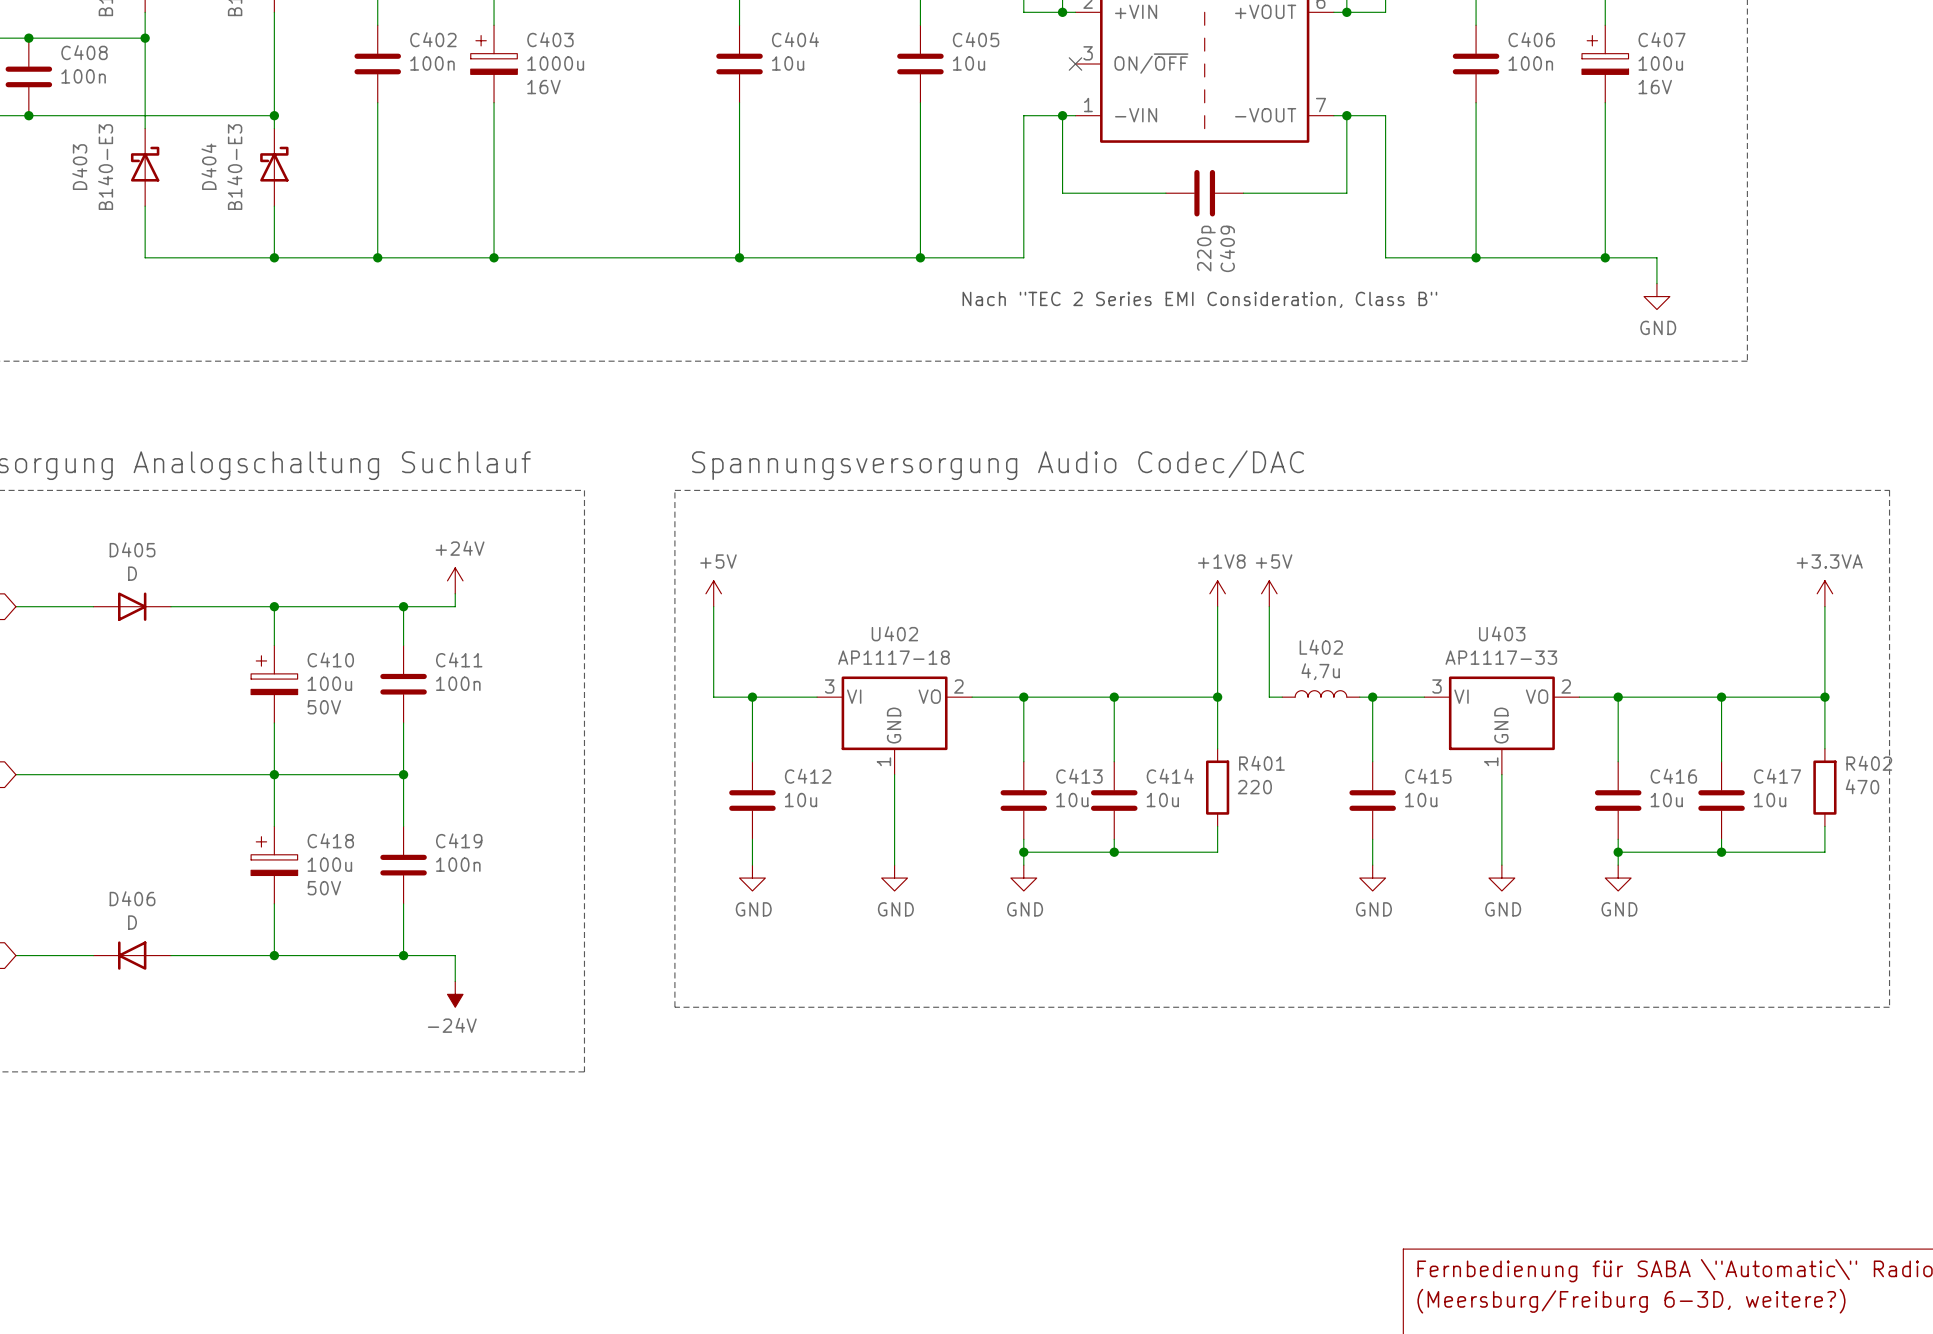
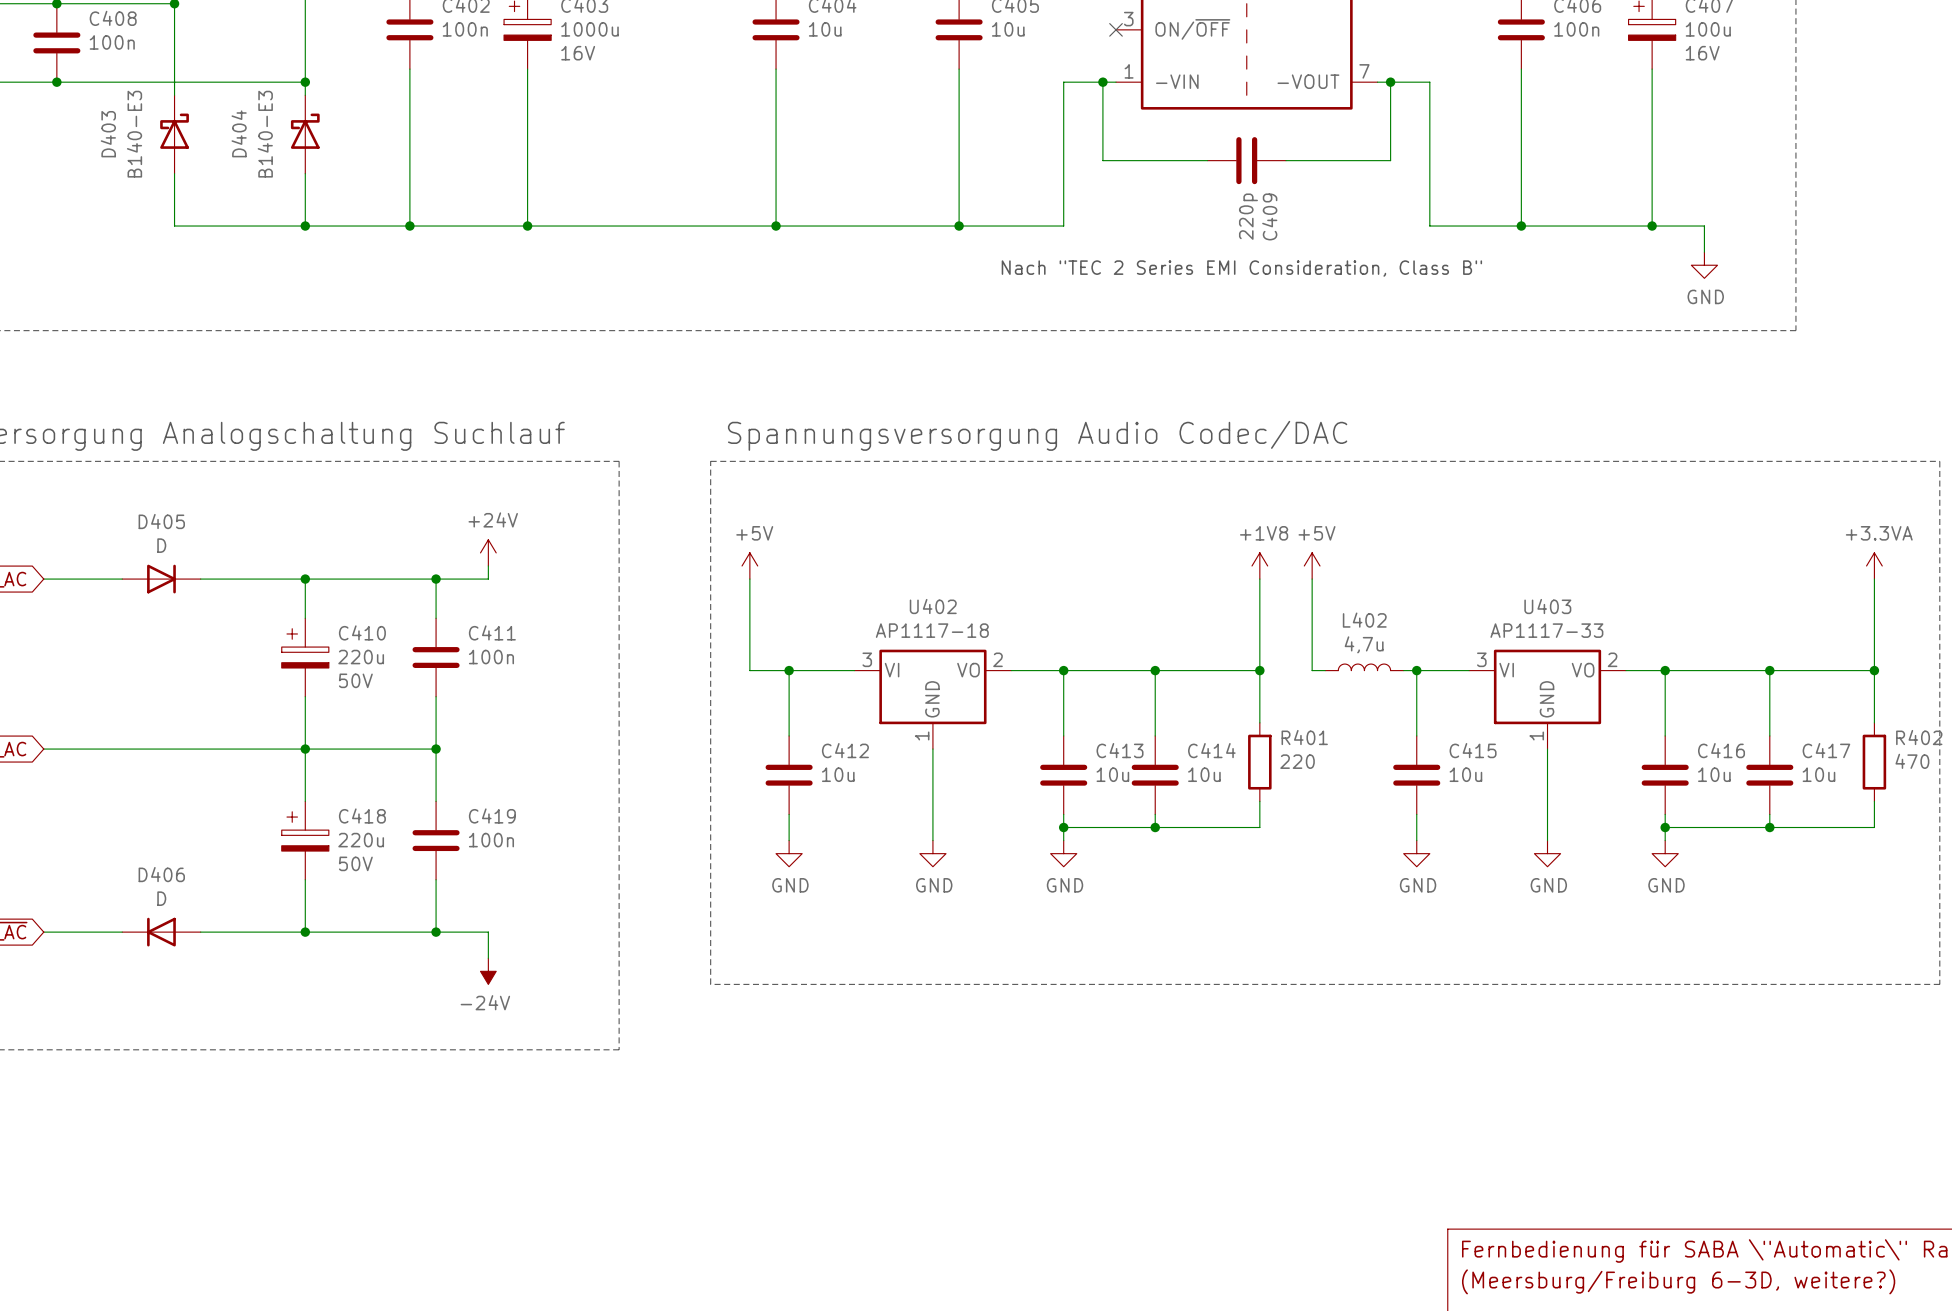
C410 value: 100u (329, 683) -> 220u (361, 657)
C418 value: 100u (329, 864) -> 220u (361, 840)

